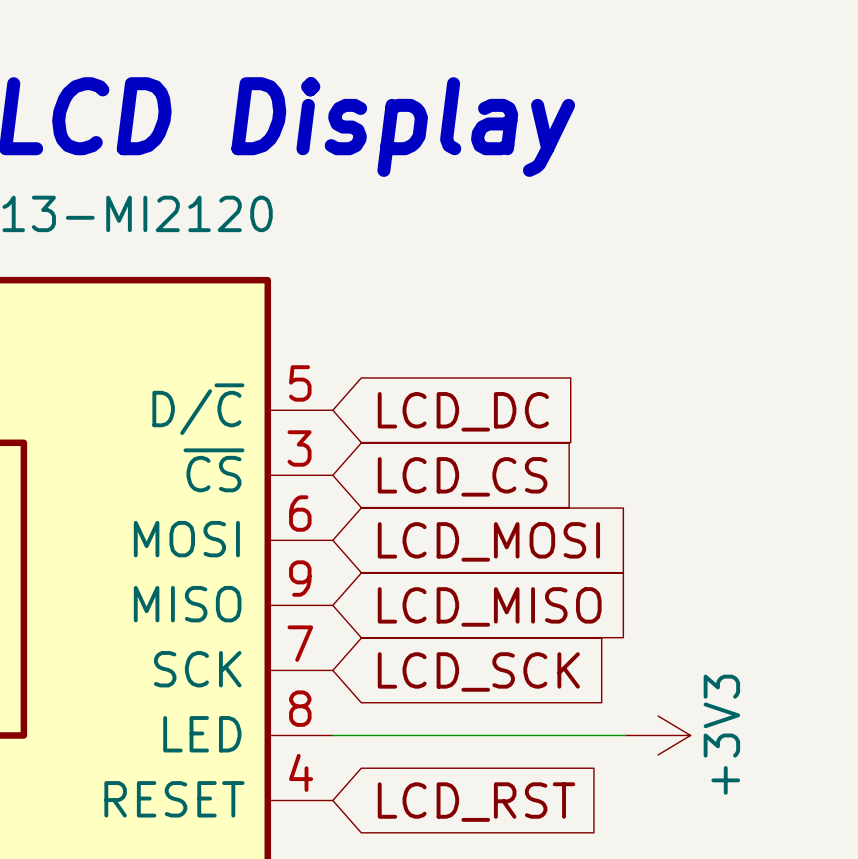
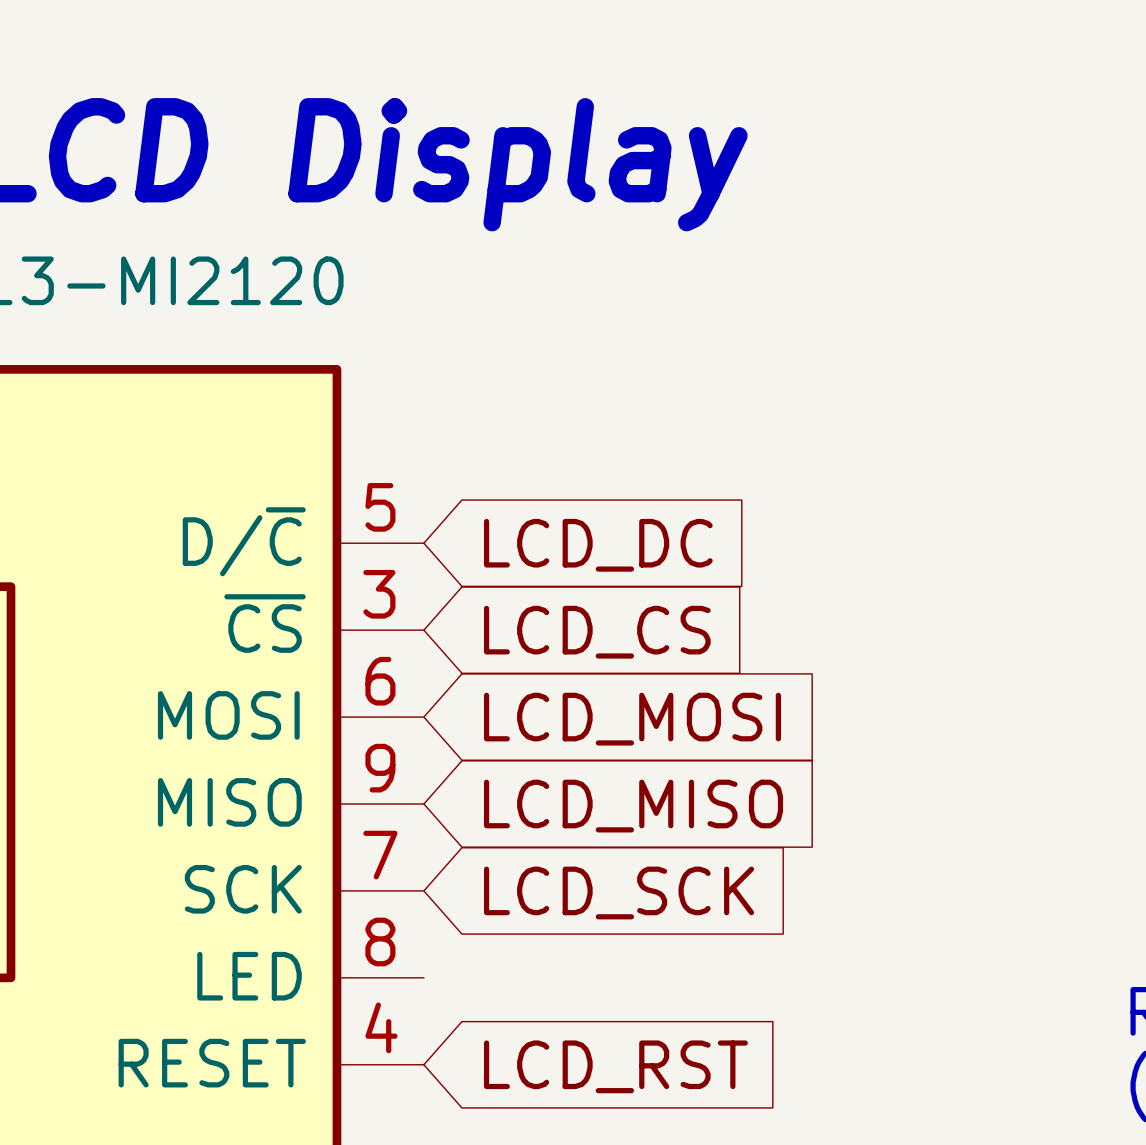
wire: (332, 735) (625, 735) -> none
power symbol: +3V3 (658, 735) -> none

